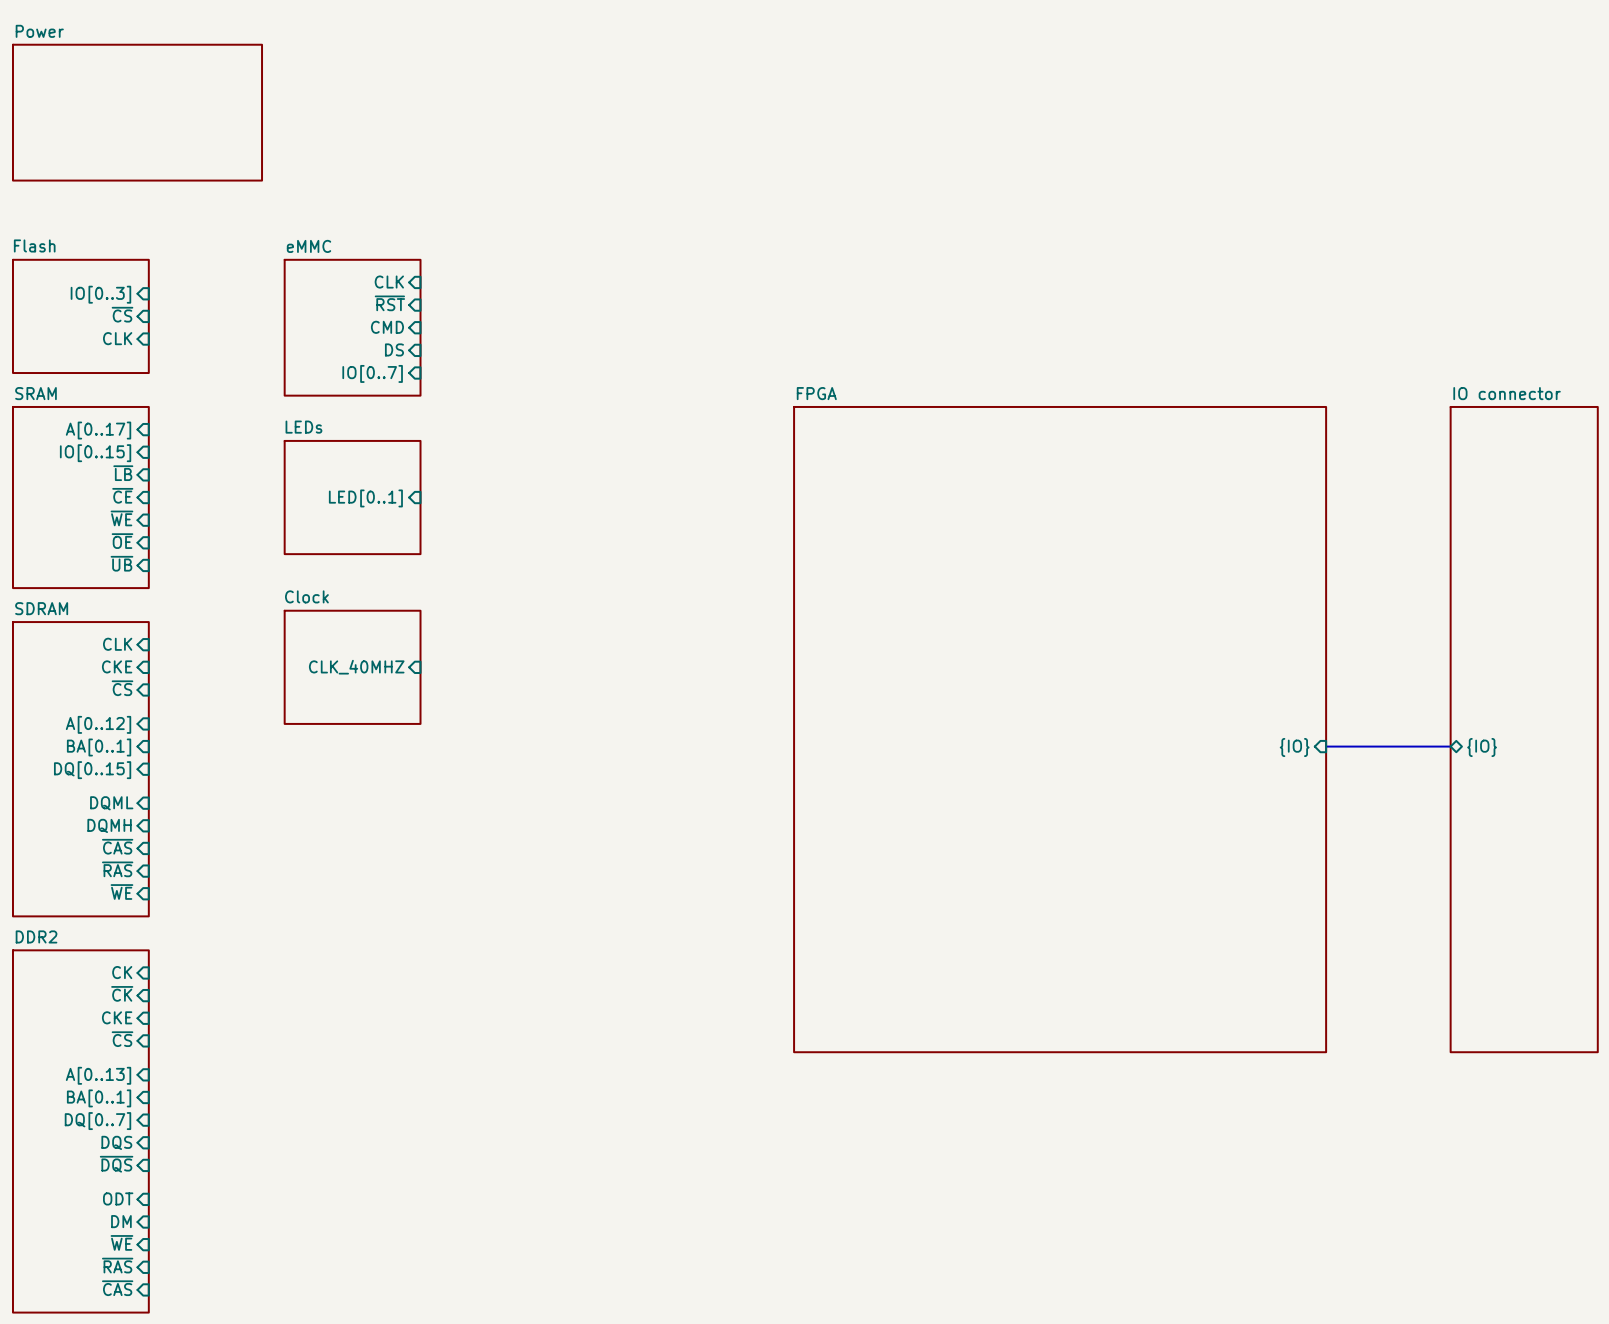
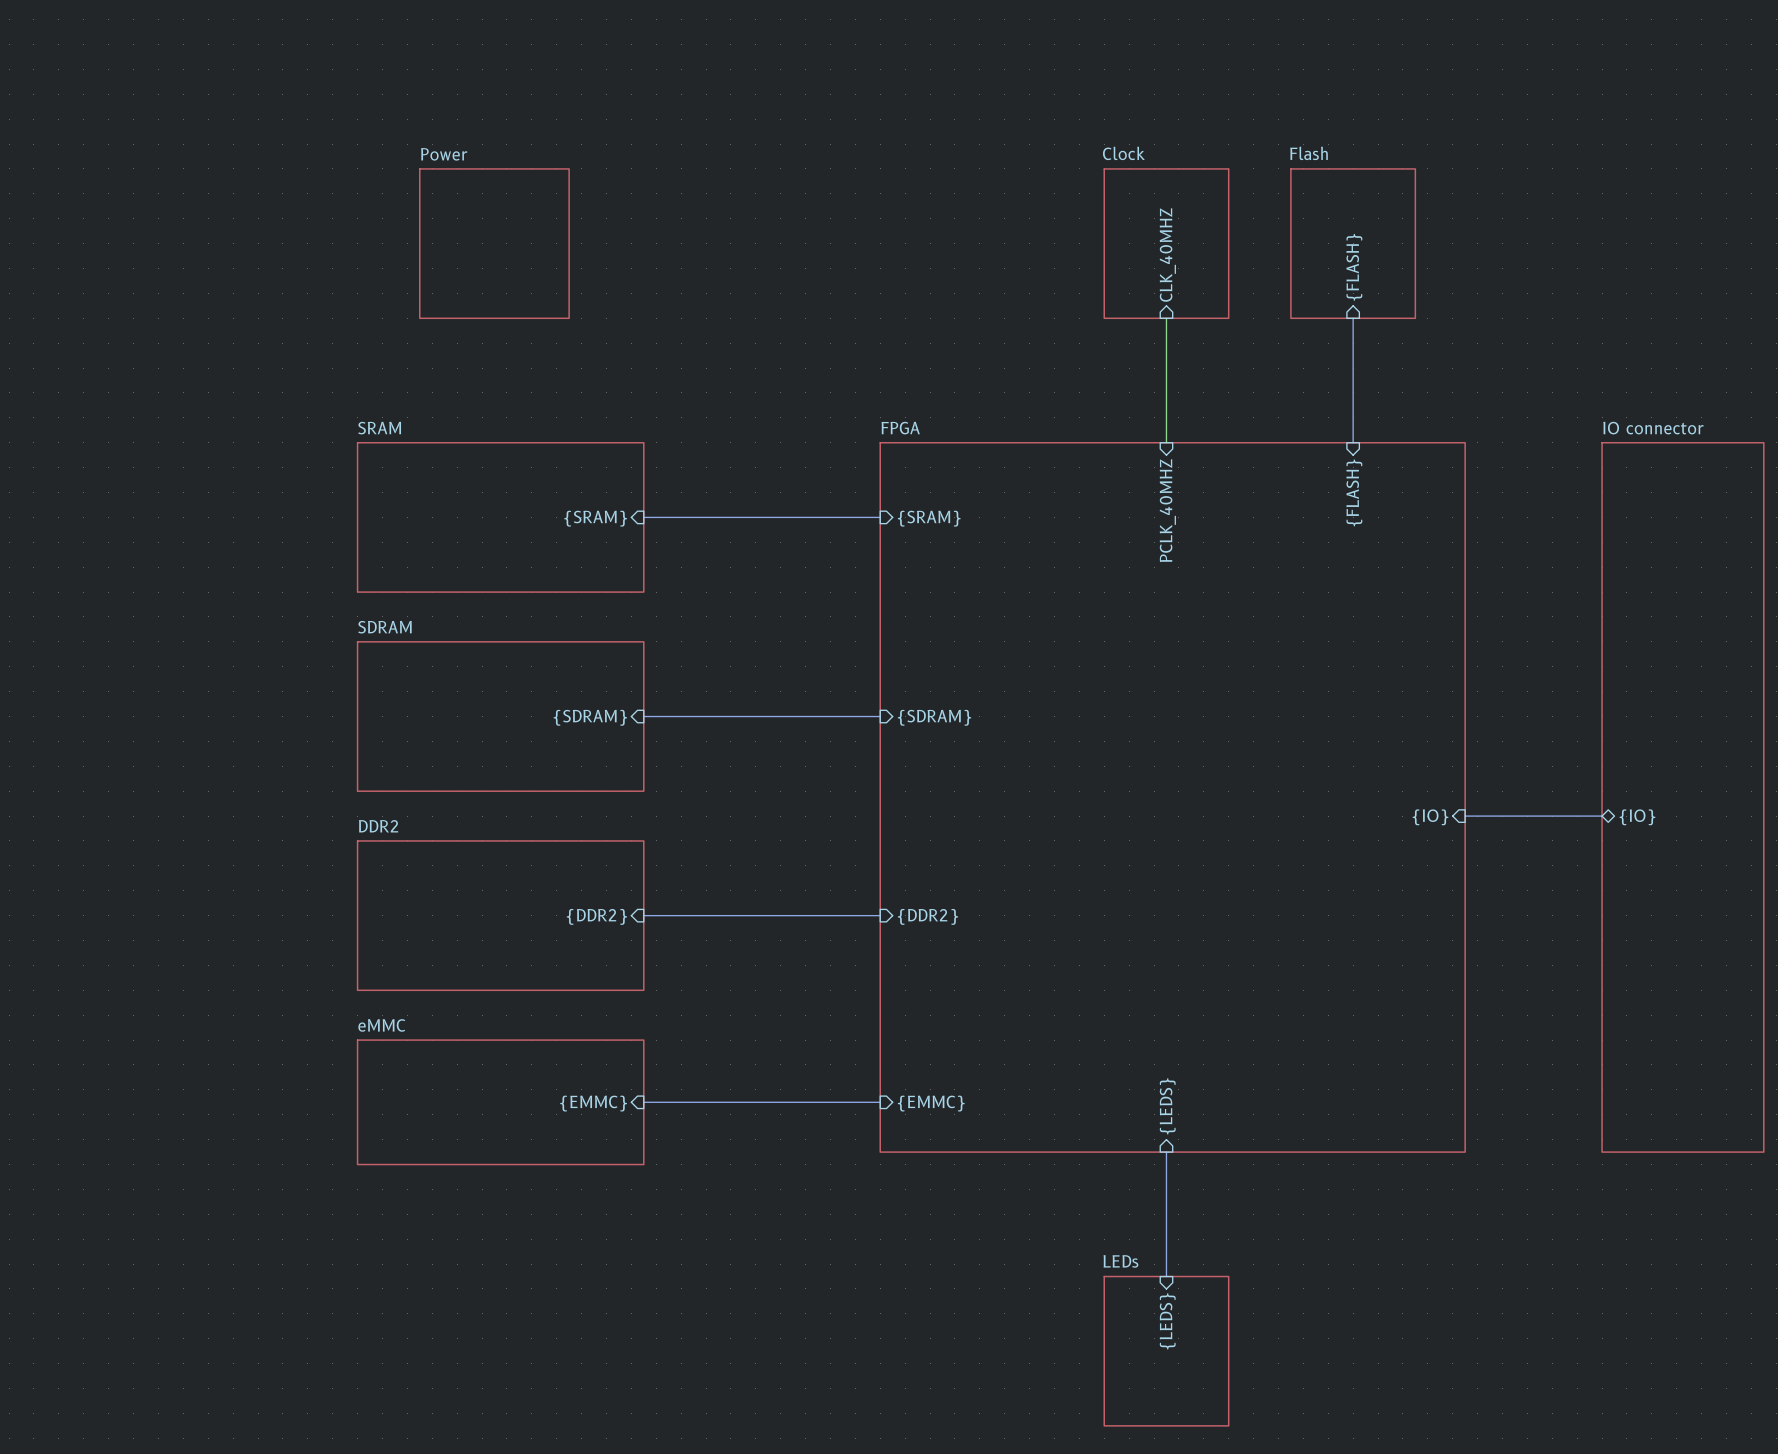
sheet Power: (137, 112) -> none
sheet Power: none -> (494, 243)
sheet Clock: none -> (1166, 243)
sheet Flash: none -> (1353, 243)
sheet pin: none -> CLK_40MHZ (1167, 255)
sheet pin: none -> {FLASH} (1354, 267)
sheet pin: CLK (389, 282) -> none
wire: none -> (1166, 318) (1166, 442)
bus: none -> (1353, 318) (1353, 442)
sheet pin: IO[0..3] (100, 294) -> none
sheet pin: ~{RST} (389, 303) -> none
sheet pin: ~{CS} (122, 314) -> none
sheet Flash: (80, 316) -> none
sheet eMMC: (352, 327) -> none
sheet pin: CMD (387, 327) -> none
sheet pin: CLK (117, 338) -> none
sheet pin: DS (394, 349) -> none
sheet pin: IO[0..7] (372, 373) -> none
sheet pin: A[0..17] (98, 430) -> none
sheet pin: IO[0..15] (95, 453) -> none
sheet pin: none -> {FLASH} (1354, 492)
sheet pin: ~{LB} (123, 473) -> none
sheet SRAM: none -> (500, 517)
bus: none -> (643, 517) (880, 517)
sheet pin: none -> {SRAM} (595, 518)
sheet pin: none -> {SRAM} (929, 518)
sheet pin: none -> PCLK_40MHZ (1167, 510)
sheet pin: ~{CE} (122, 495) -> none
sheet SRAM: (80, 497) -> none
sheet LEDs: (352, 497) -> none
sheet pin: LED[0..1] (365, 498) -> none
sheet pin: ~{WE} (121, 518) -> none
sheet pin: ~{OE} (122, 541) -> none
sheet pin: ~{UB} (121, 563) -> none
sheet pin: CLK (117, 644) -> none
sheet SDRAM: none -> (500, 716)
sheet pin: none -> {SDRAM} (590, 717)
bus: none -> (643, 716) (880, 716)
sheet pin: none -> {SDRAM} (934, 717)
sheet pin: CKE (117, 666) -> none
sheet Clock: (352, 667) -> none
sheet pin: CLK_40MHZ (356, 667) -> none
sheet pin: ~{CS} (122, 688) -> none
sheet pin: A[0..12] (98, 724) -> none
sheet pin: BA[0..1] (99, 747) -> none
sheet SDRAM: (80, 769) -> none
sheet pin: DQ[0..15] (92, 770) -> none
sheet pin: DQML (111, 803) -> none
sheet pin: DQMH (109, 825) -> none
bus: none -> (643, 915) (880, 915)
sheet pin: none -> {DDR2} (596, 916)
sheet pin: none -> {DDR2} (927, 916)
sheet pin: ~{CAS} (117, 846) -> none
sheet pin: ~{RAS} (117, 869) -> none
sheet pin: ~{WE} (121, 892) -> none
sheet DDR2 name position: DDR2 (36, 936) -> DDR2 (378, 826)
sheet DDR2 shape: [12, 949, 150, 1314] -> [356, 840, 645, 992]
sheet pin: CK (122, 972) -> none
sheet pin: ~{CK} (122, 993) -> none
sheet eMMC: none -> (500, 1102)
bus: none -> (643, 1102) (880, 1102)
sheet pin: none -> {EMMC} (593, 1103)
sheet pin: none -> {EMMC} (931, 1103)
sheet pin: none -> {LEDS} (1167, 1106)
sheet pin: CKE (117, 1017) -> none
sheet pin: ~{CS} (122, 1039) -> none
bus: none -> (1166, 1152) (1166, 1276)
sheet pin: A[0..13] (98, 1075) -> none
sheet pin: BA[0..1] (99, 1098) -> none
sheet pin: DQ[0..7] (97, 1121) -> none
sheet pin: DQS (116, 1142) -> none
sheet pin: ~{DQS} (116, 1164) -> none
sheet pin: ODT (118, 1198) -> none
sheet pin: none -> {LEDS} (1167, 1321)
sheet pin: DM (121, 1221) -> none
sheet LEDs: none -> (1166, 1351)
sheet pin: ~{WE} (121, 1242) -> none
sheet pin: ~{RAS} (117, 1265) -> none
sheet pin: ~{CAS} (117, 1288) -> none

